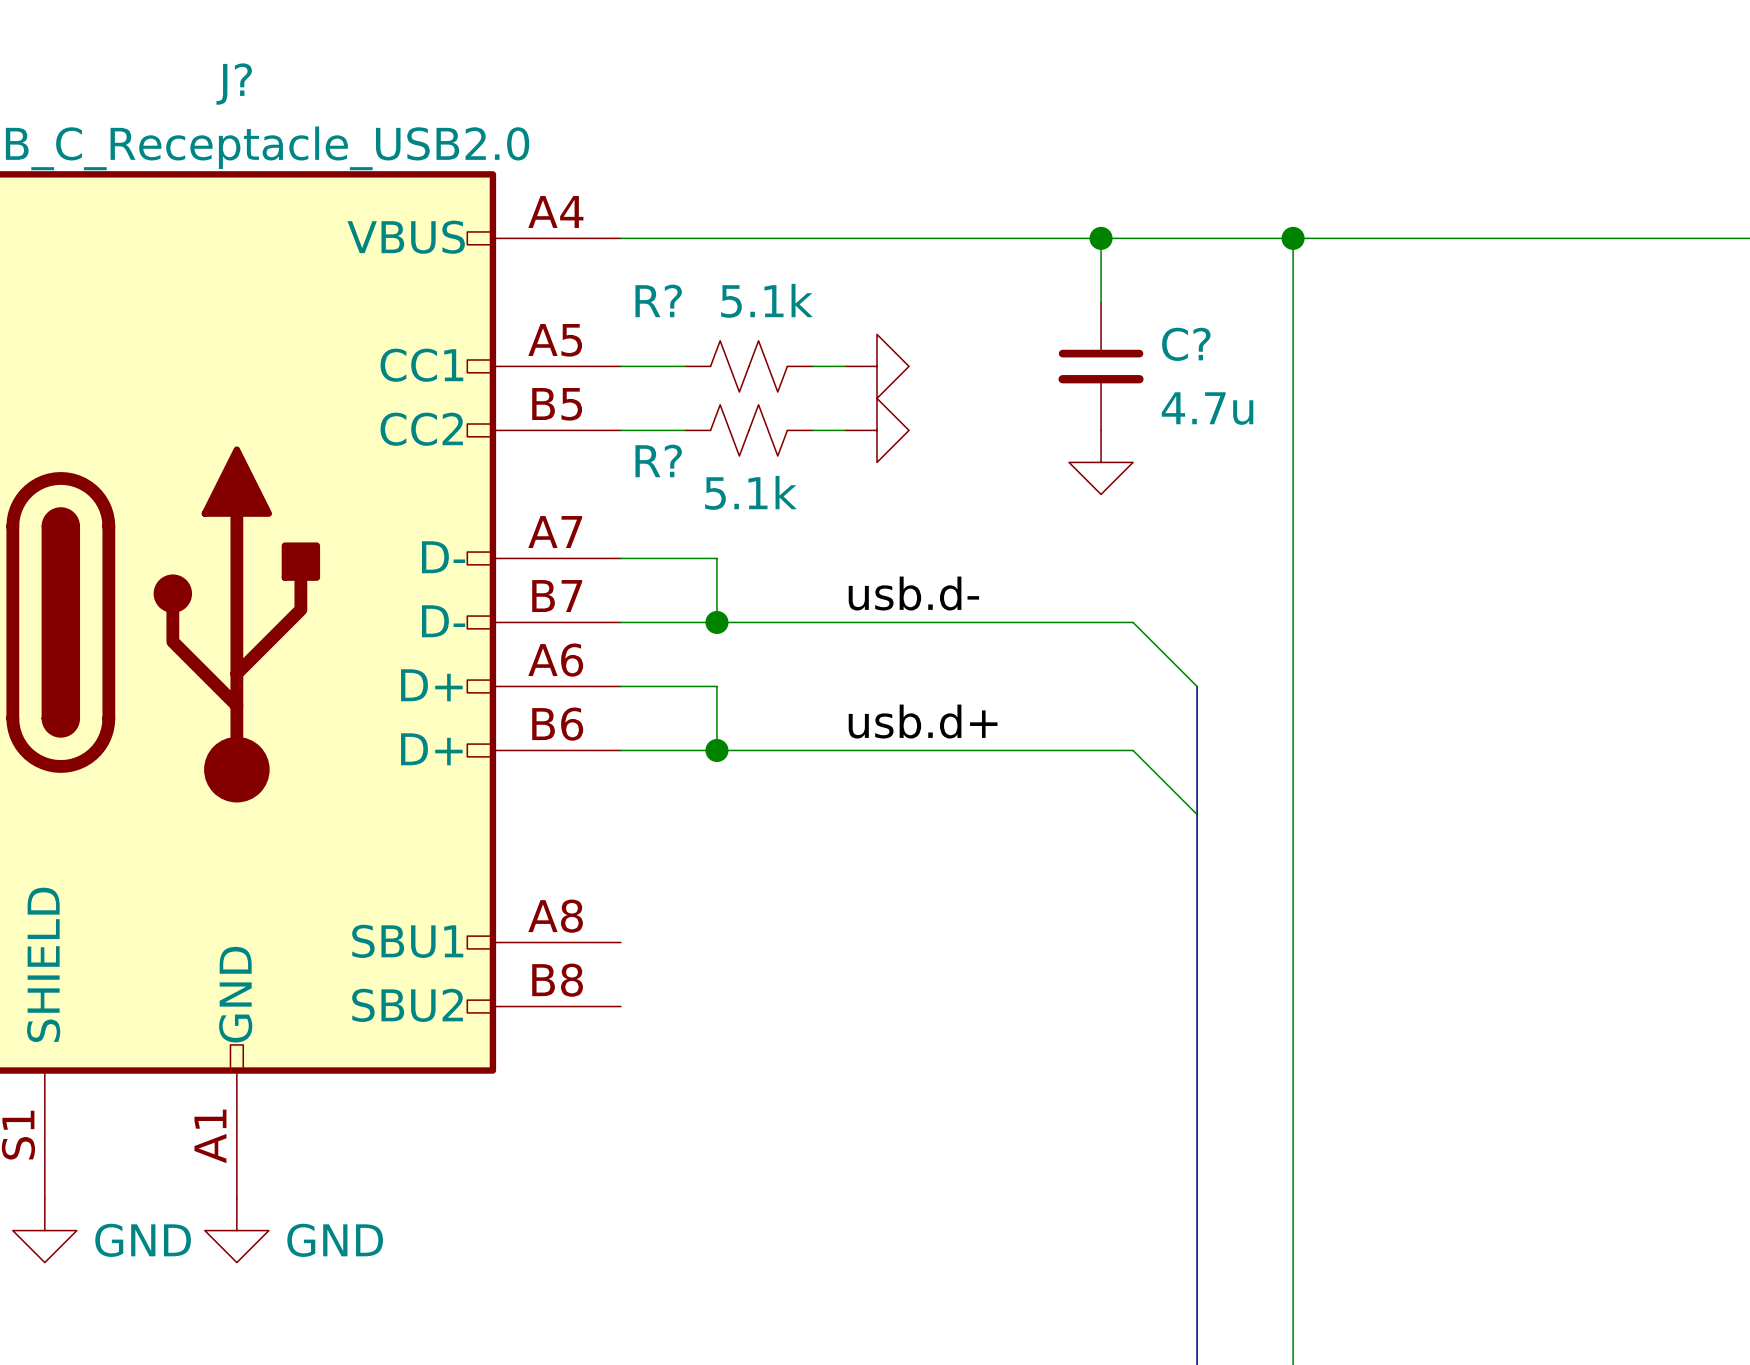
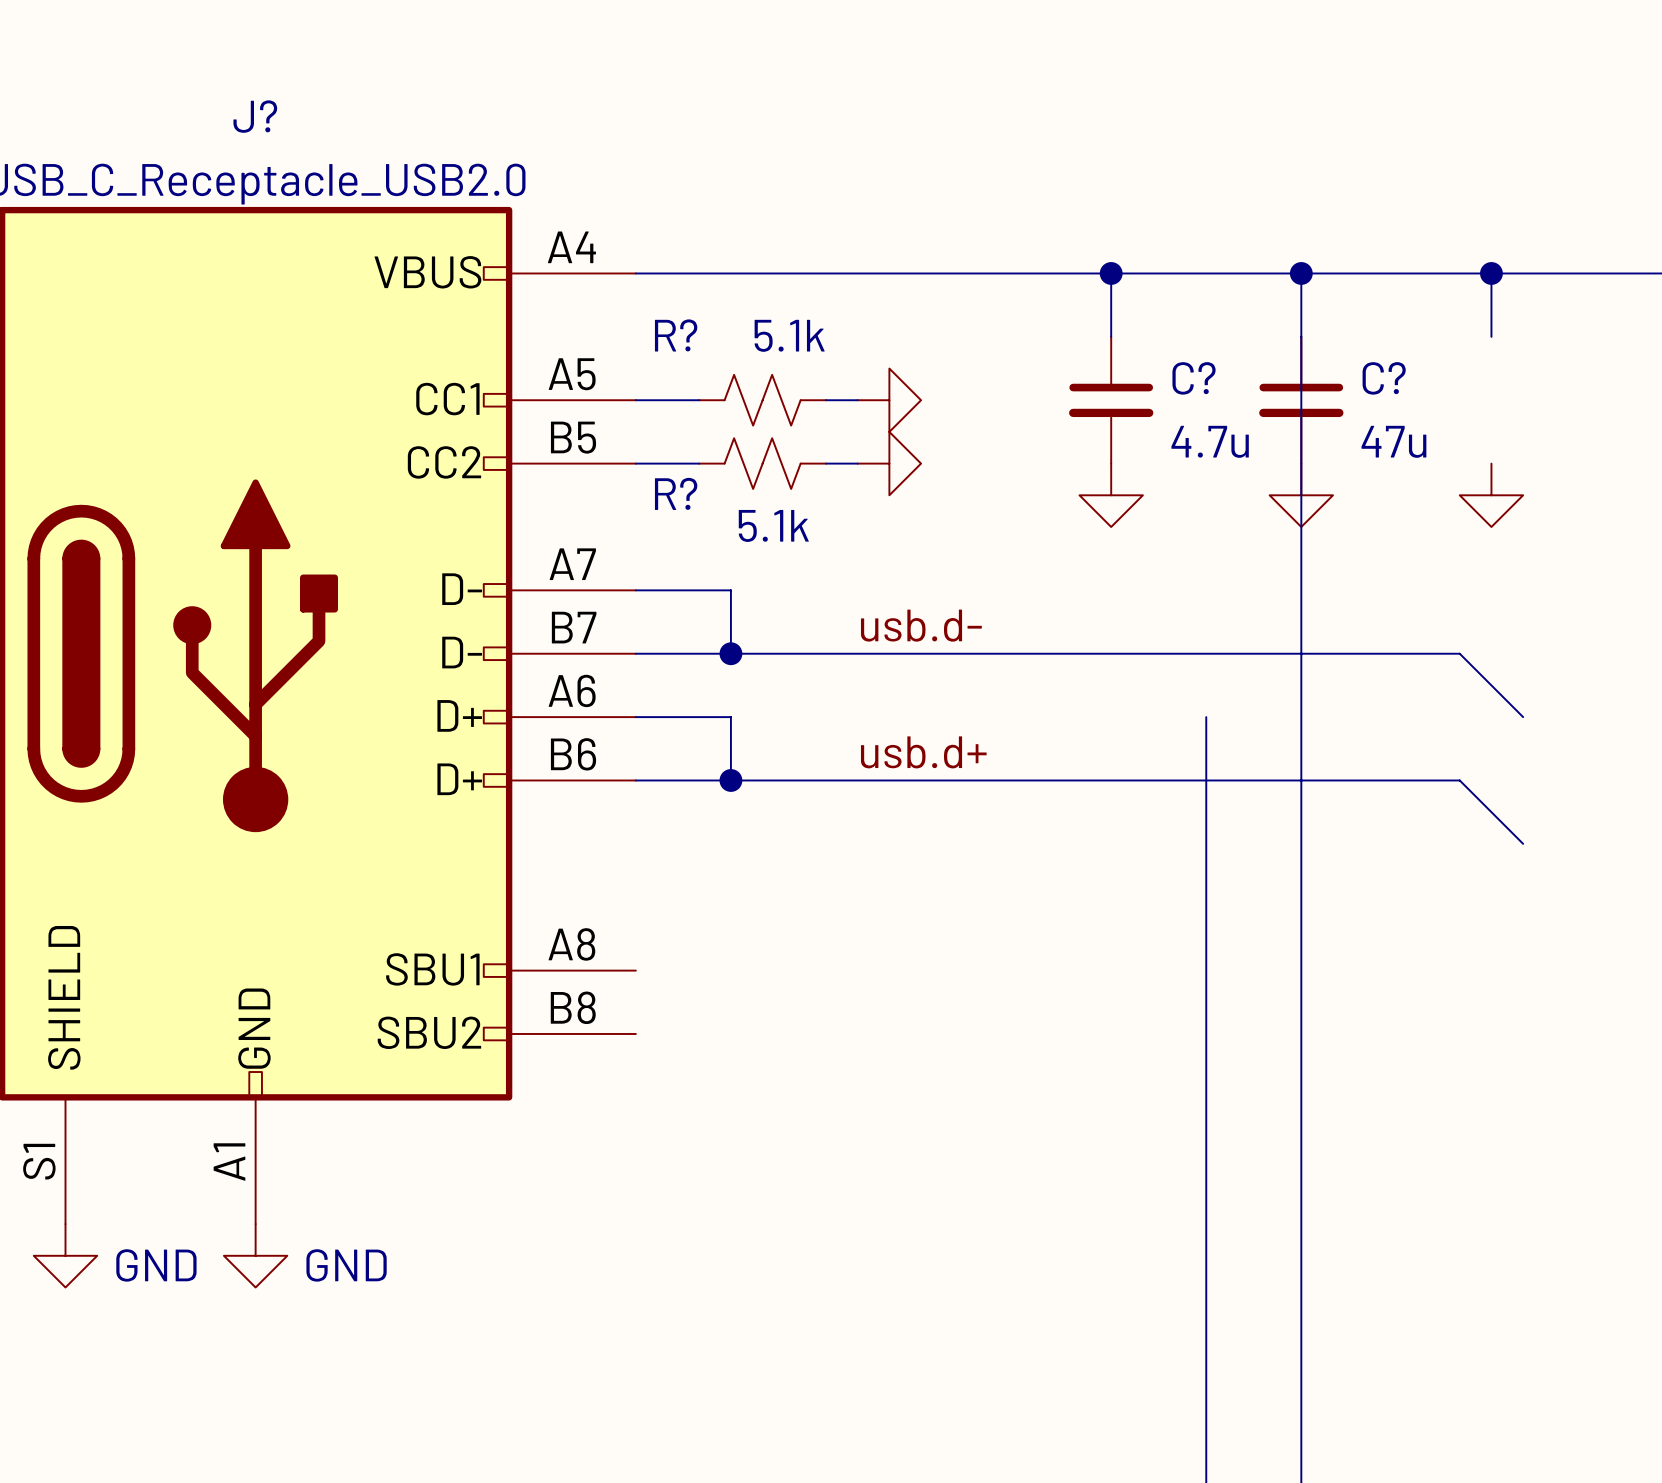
wire: none -> (1491, 273) (1491, 336)
junction: none -> (1491, 273)
C?: none -> 47u (1301, 400)
power symbol: none -> (1301, 495)
power symbol: none -> (1491, 495)
wire: (1133, 622) (1197, 686) -> (1142, 653) (1459, 653) (1523, 717)
wire: (1133, 750) (1197, 814) -> (1142, 780) (1459, 780) (1523, 843)

